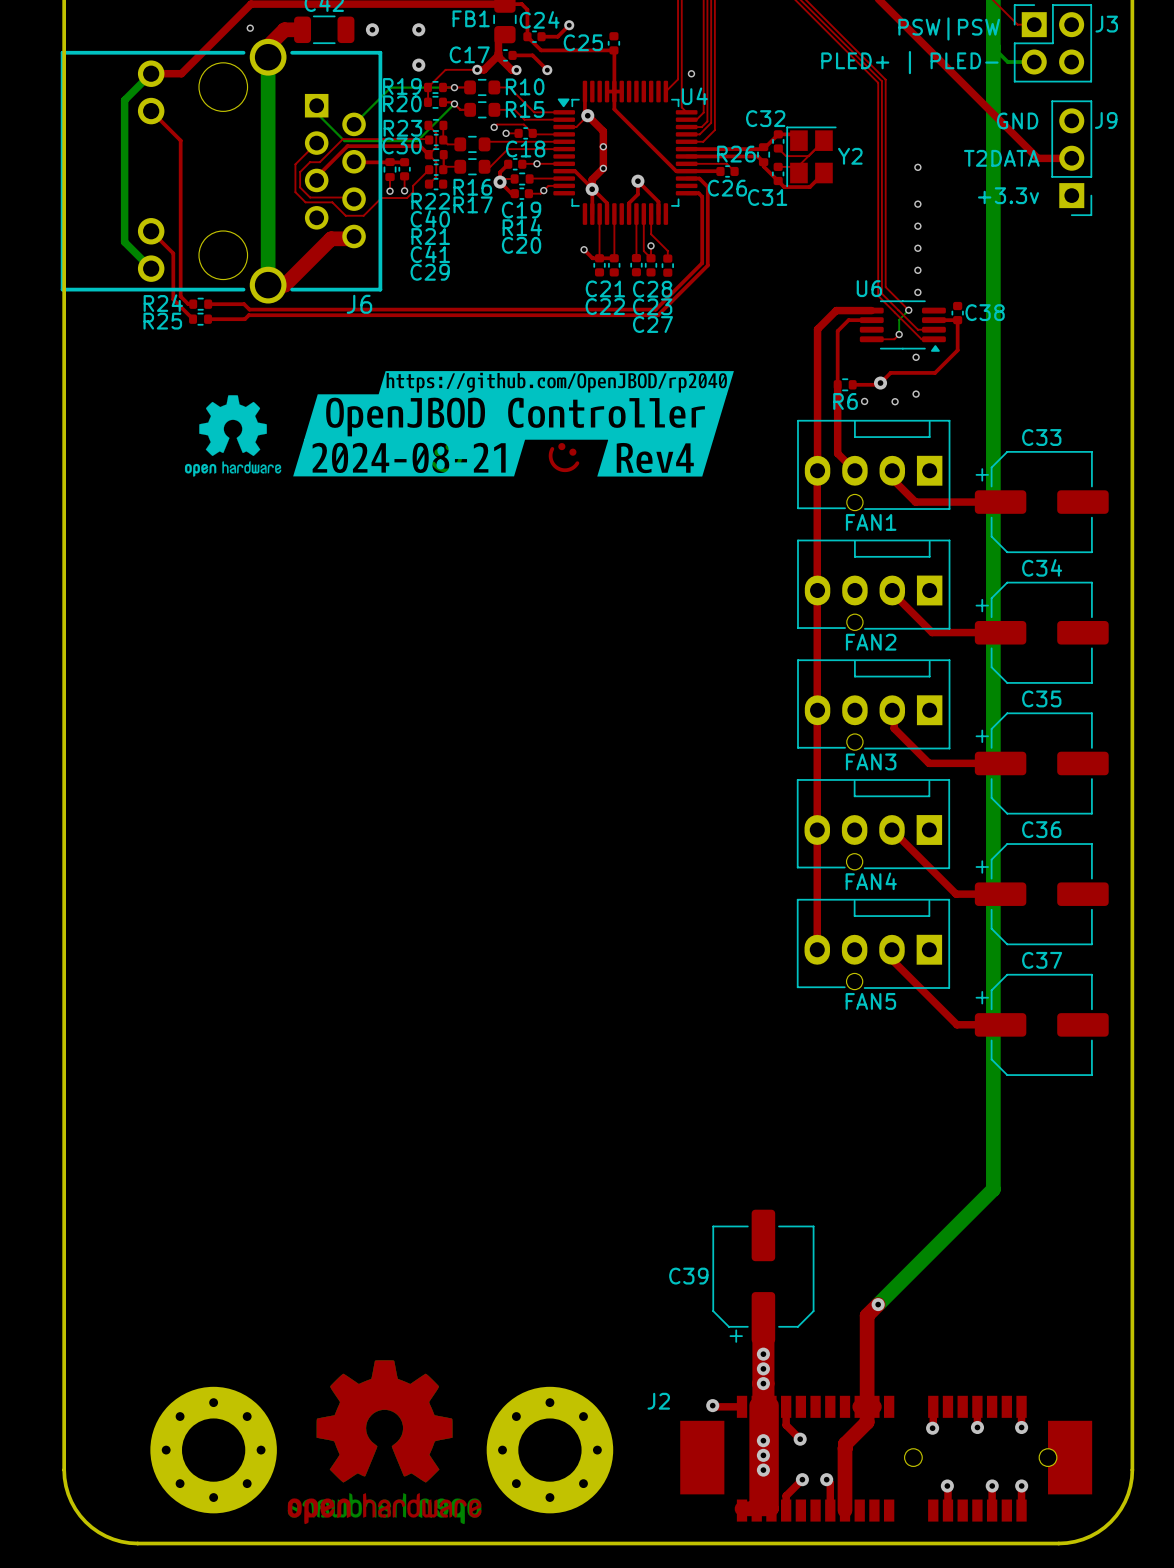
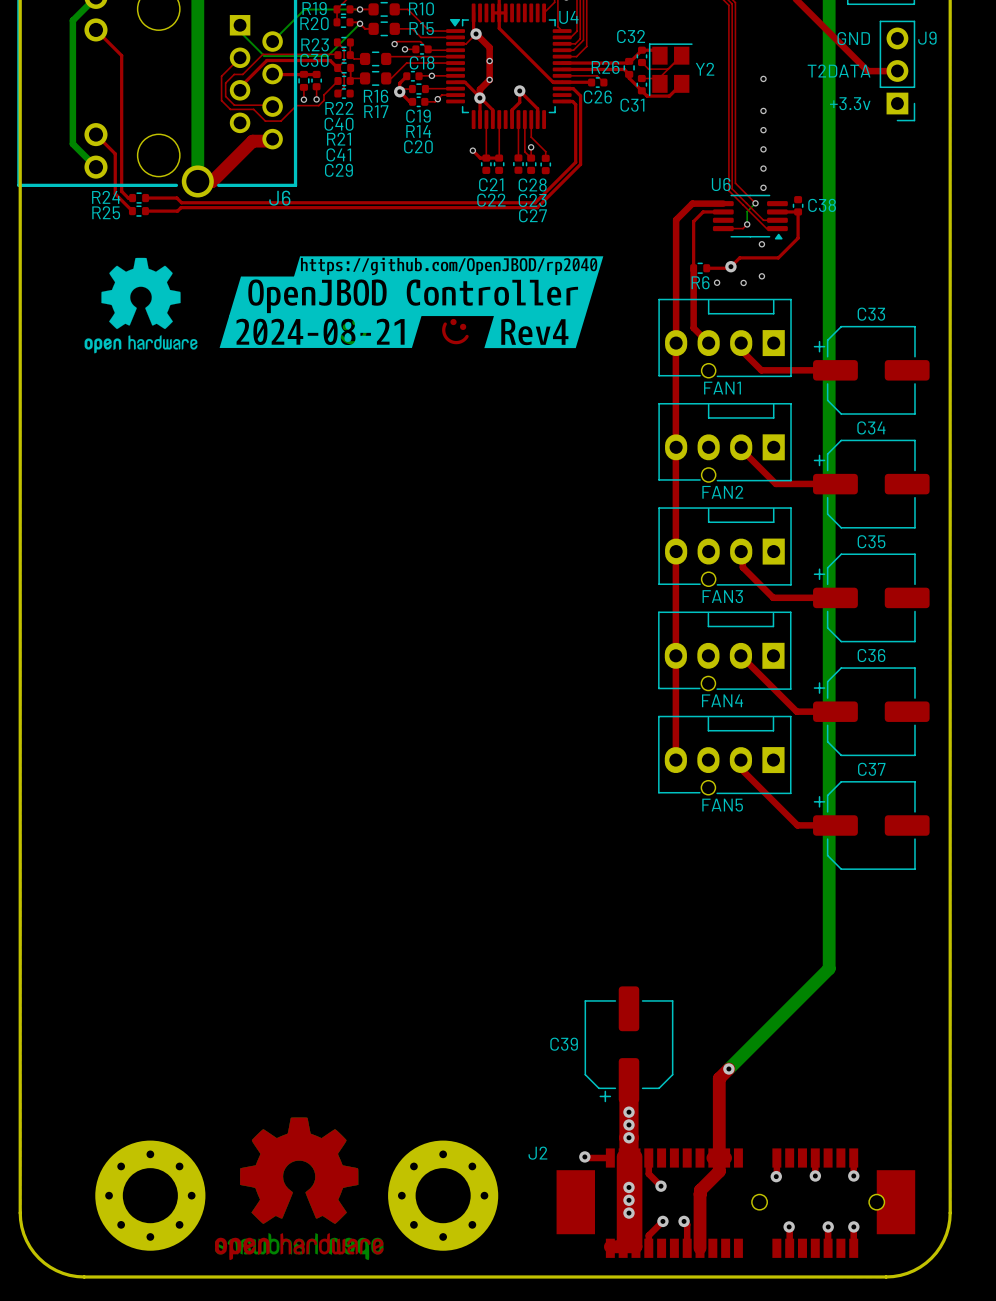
drawing: none -> [84, 257, 198, 354]
drawing: [184, 395, 282, 477] -> none

